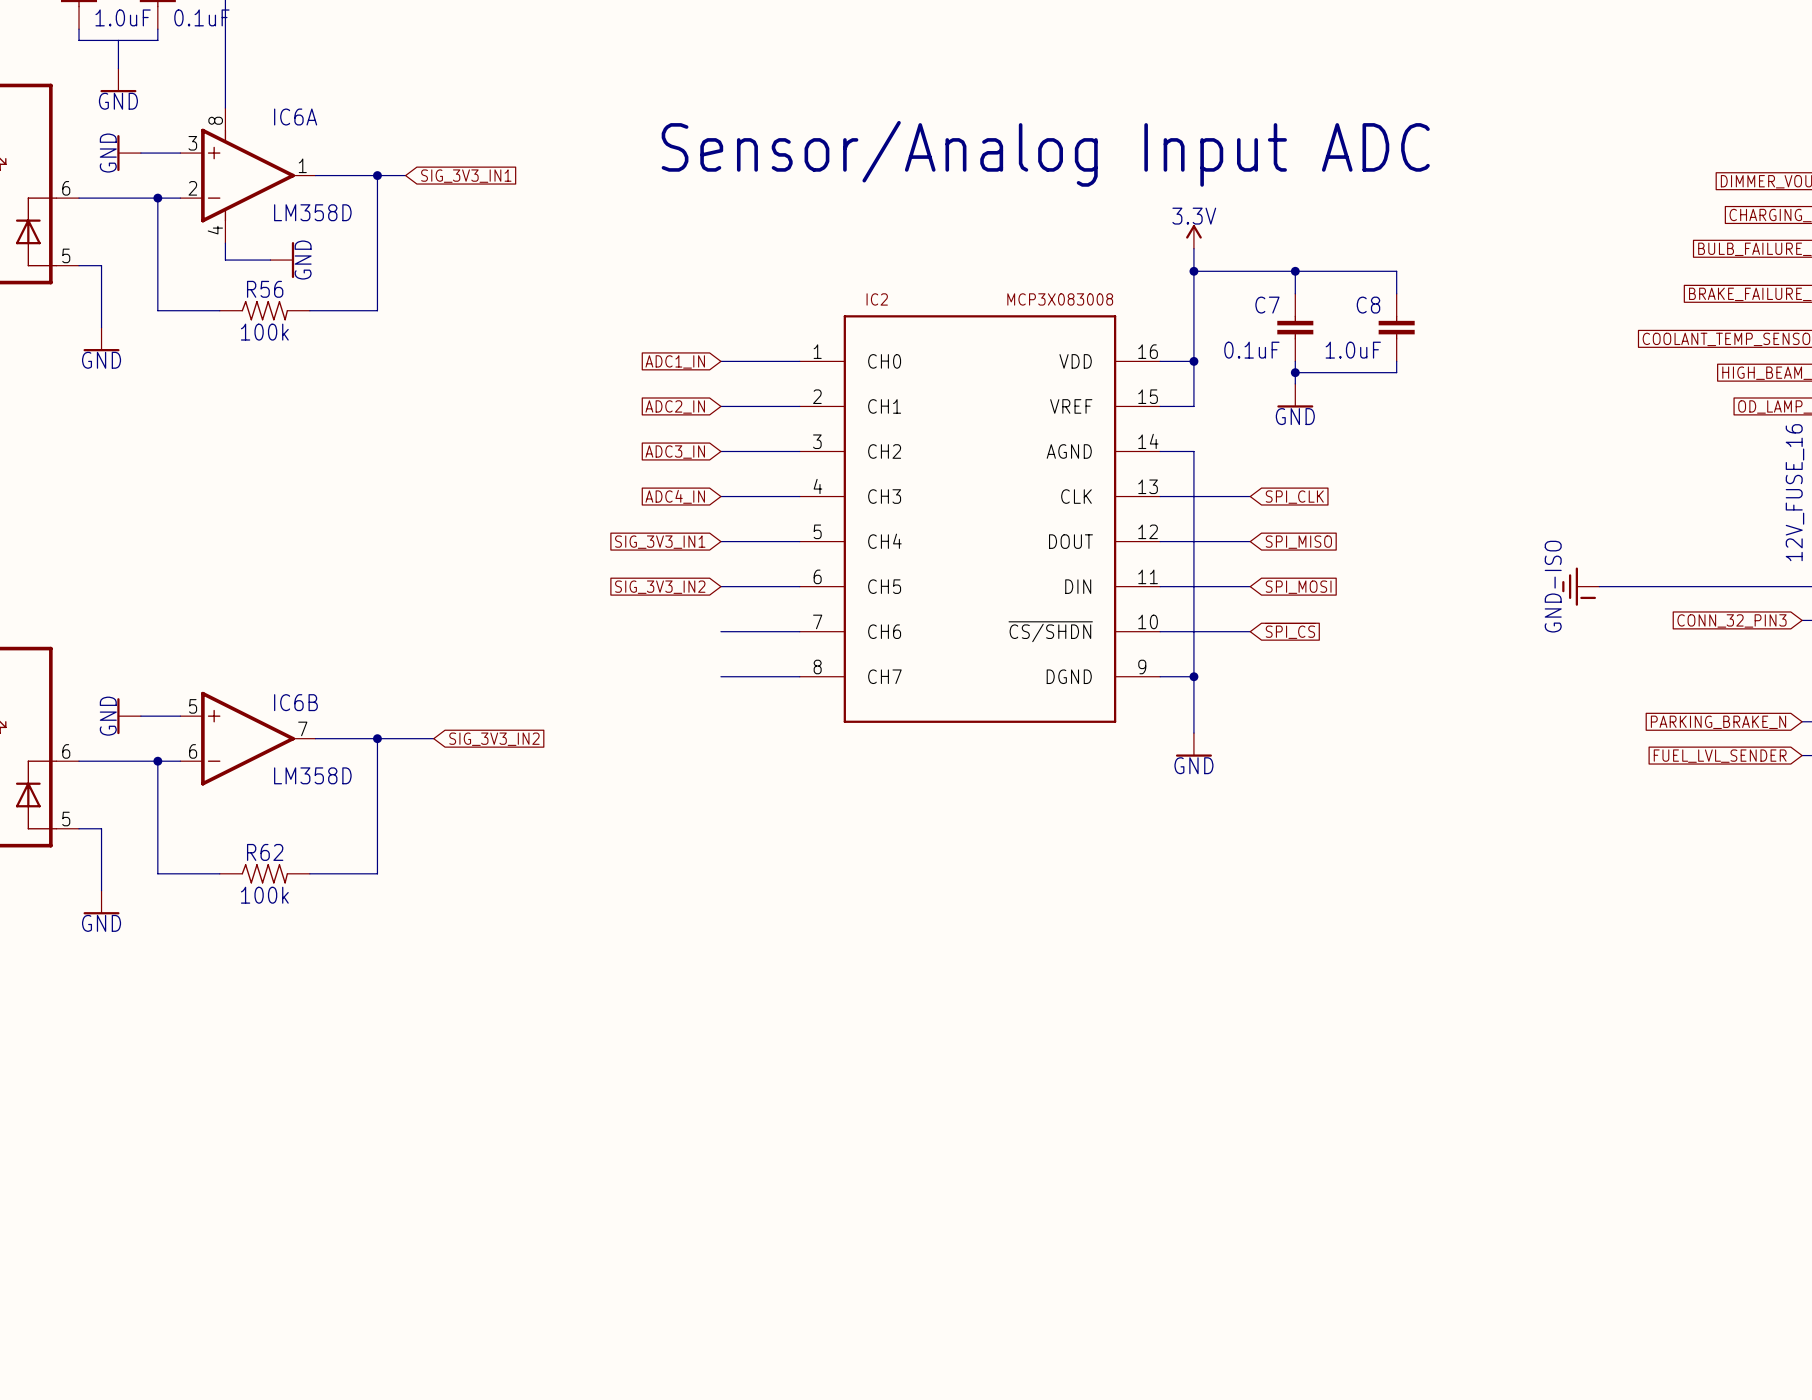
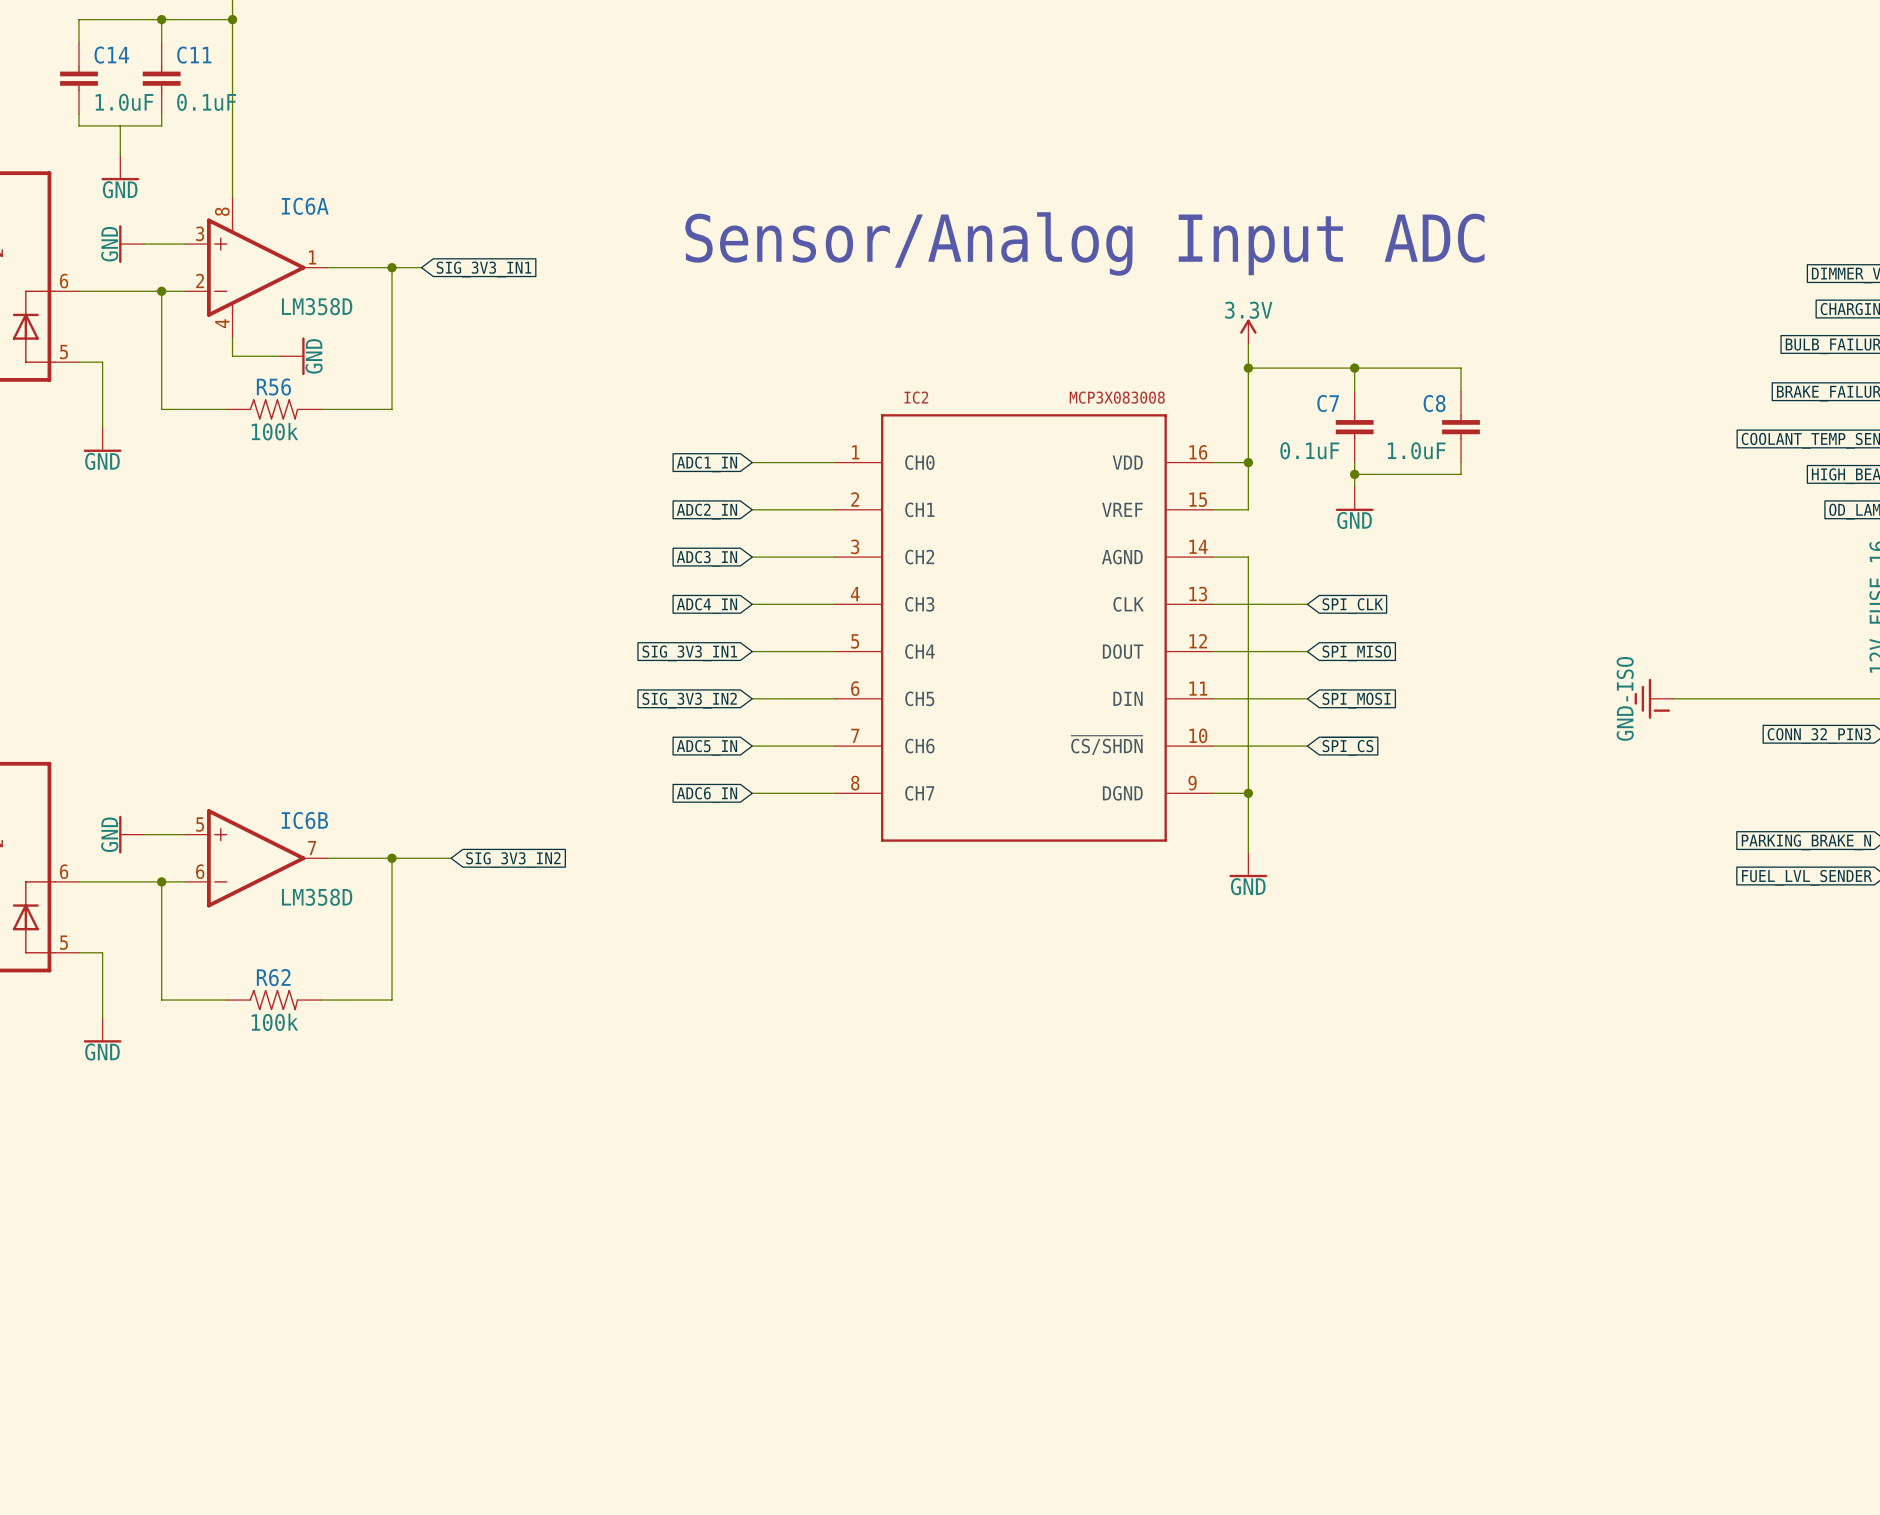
global label: none -> ADC5_IN (707, 747)
global label: none -> ADC6_IN (707, 795)

